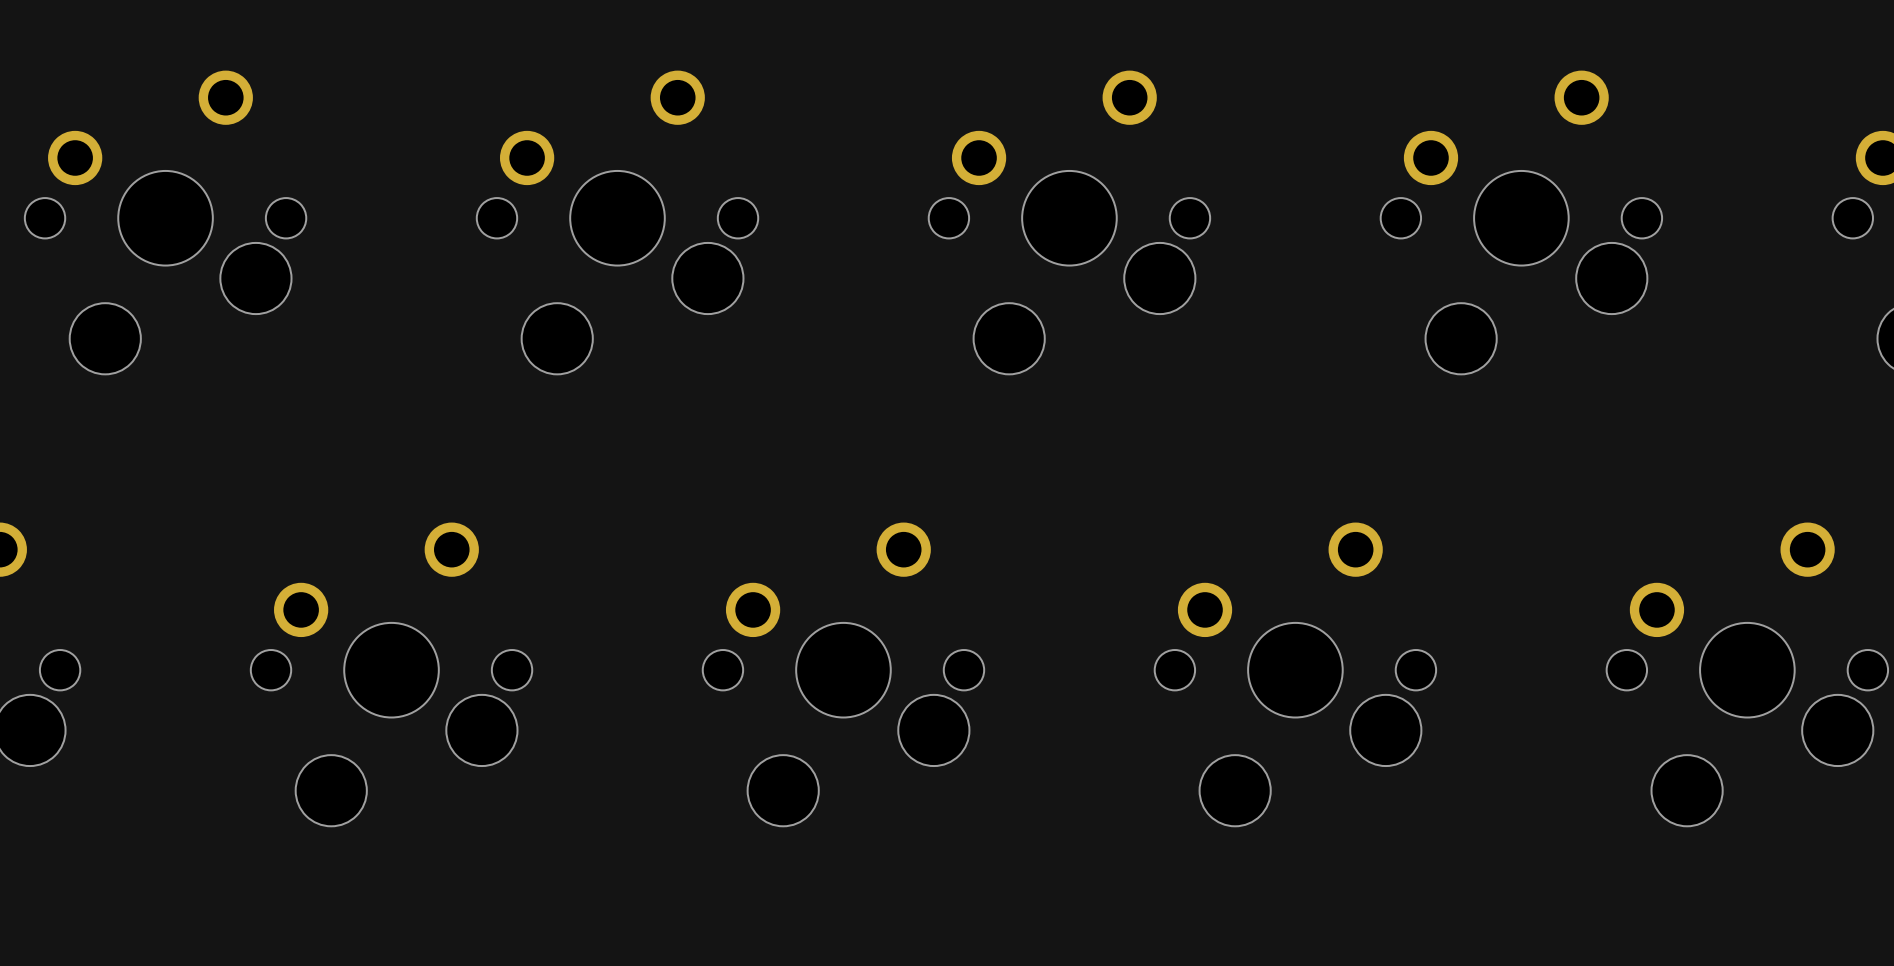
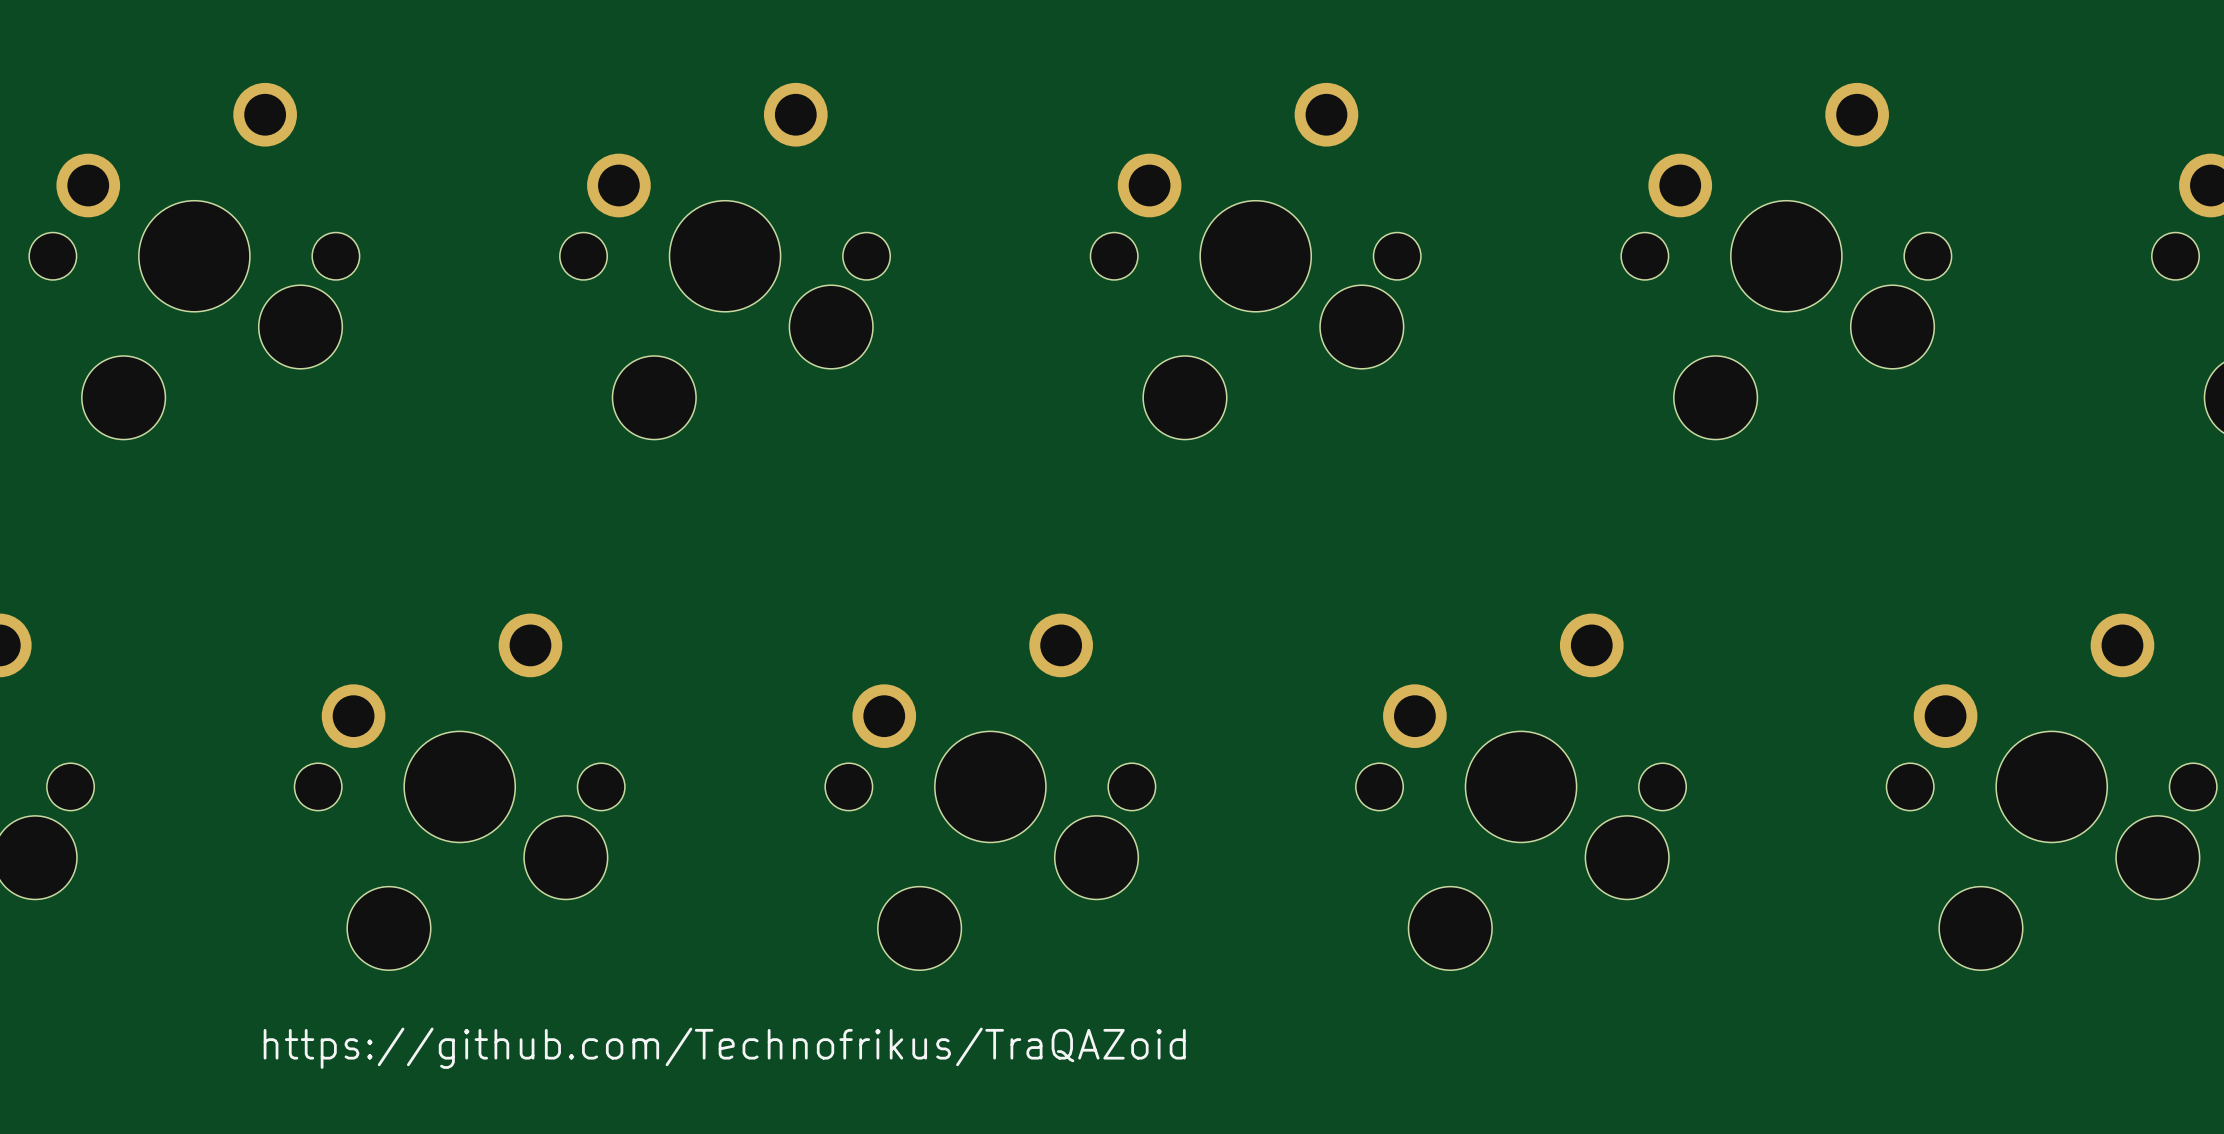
text: none -> https://github.com/Technofrikus/TraQAZoid (724, 1048)

